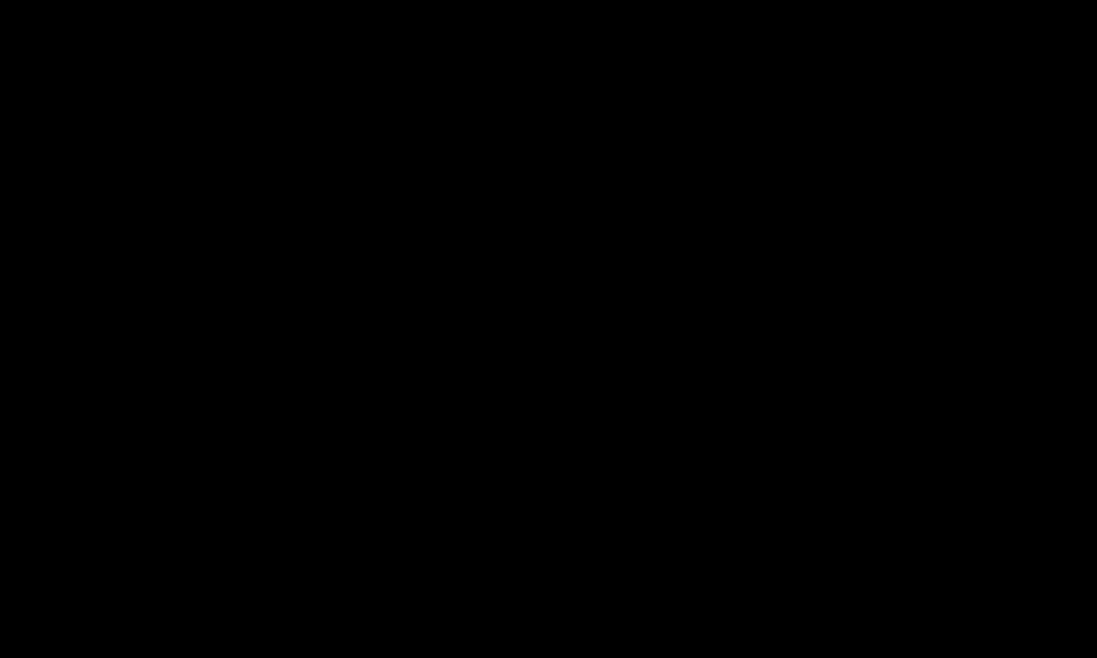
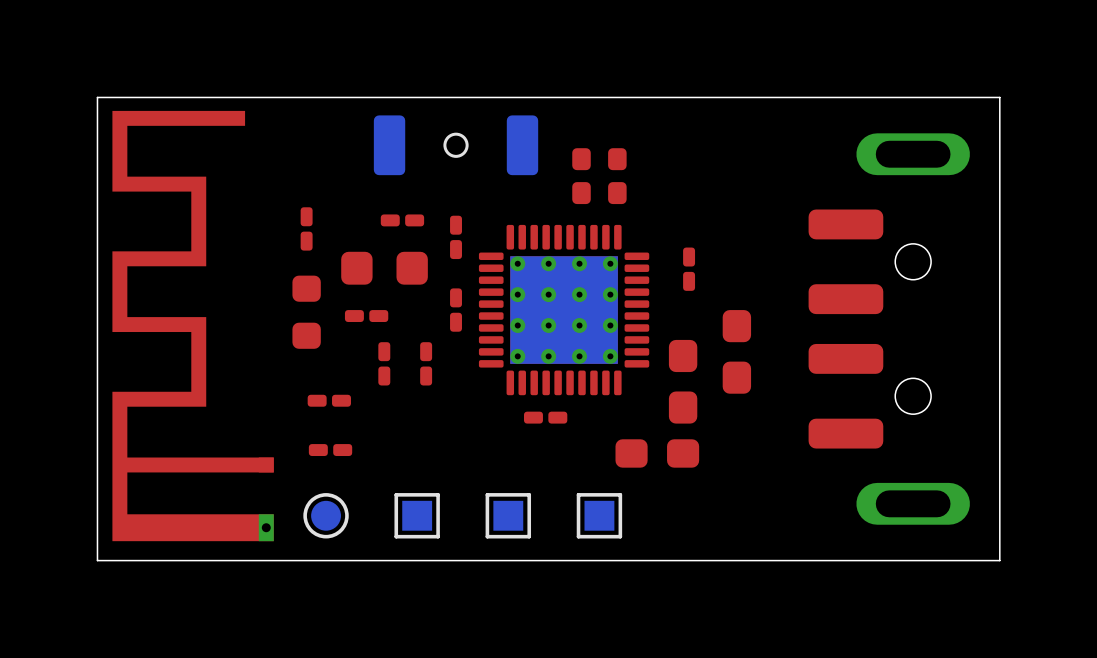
board edge: none -> (999, 97) (97, 97) (97, 560) (999, 560) (999, 97)
part: none -> (456, 145)
part: none -> (581, 176)
part: none -> (617, 176)
part: none -> (402, 220)
part: none -> (306, 228)
part: none -> (456, 237)
part: none -> (384, 268)
part: none -> (689, 269)
part: none -> (456, 310)
part: none -> (564, 310)
part: none -> (306, 312)
part: none -> (366, 316)
part: none -> (193, 326)
part: none -> (889, 329)
part: none -> (736, 351)
part: none -> (384, 363)
part: none -> (426, 363)
part: none -> (683, 381)
part: none -> (329, 400)
part: none -> (545, 417)
part: none -> (330, 450)
part: none -> (657, 453)
part: none -> (326, 515)
part: none -> (417, 515)
part: none -> (508, 515)
part: none -> (599, 515)

